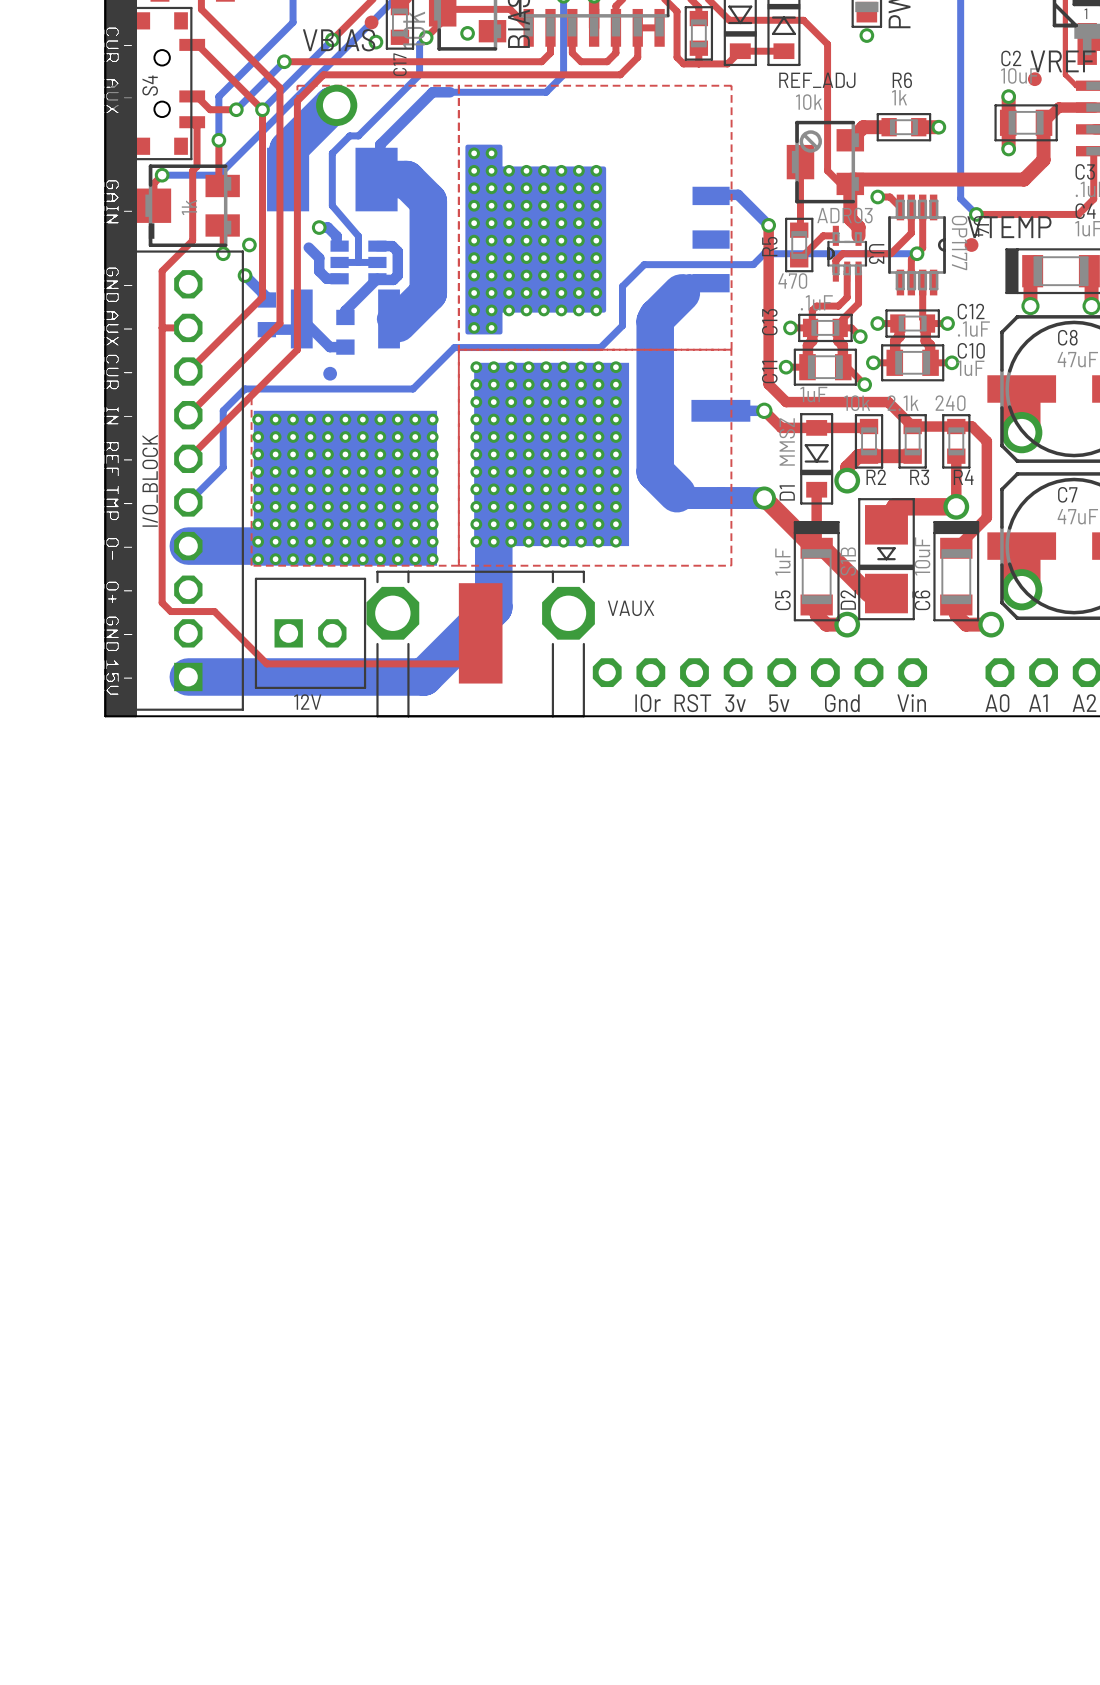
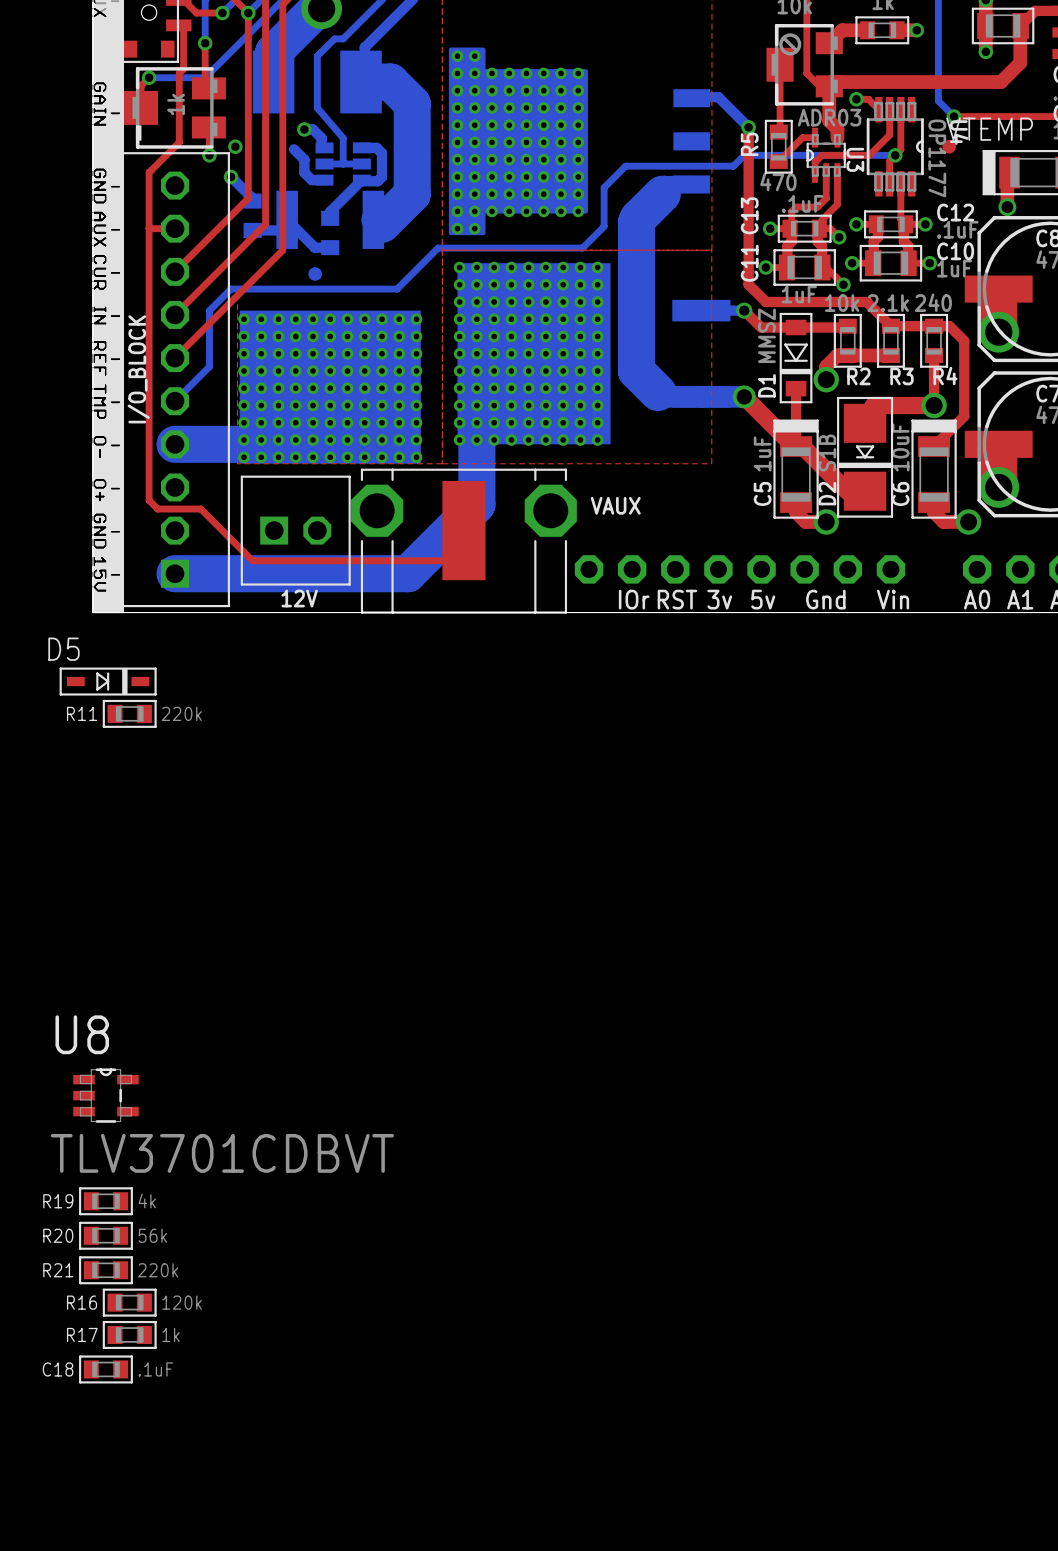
D5: none -> (108, 681)
R11: none -> 220k (129, 713)
U8: none -> TLV3701CDBVT (105, 1095)
R19: none -> 4k (105, 1201)
R20: none -> 56k (105, 1235)
R21: none -> 220k (105, 1270)
R16: none -> 120k (129, 1302)
R17: none -> 1k (129, 1334)
C18: none -> .1uF (105, 1369)

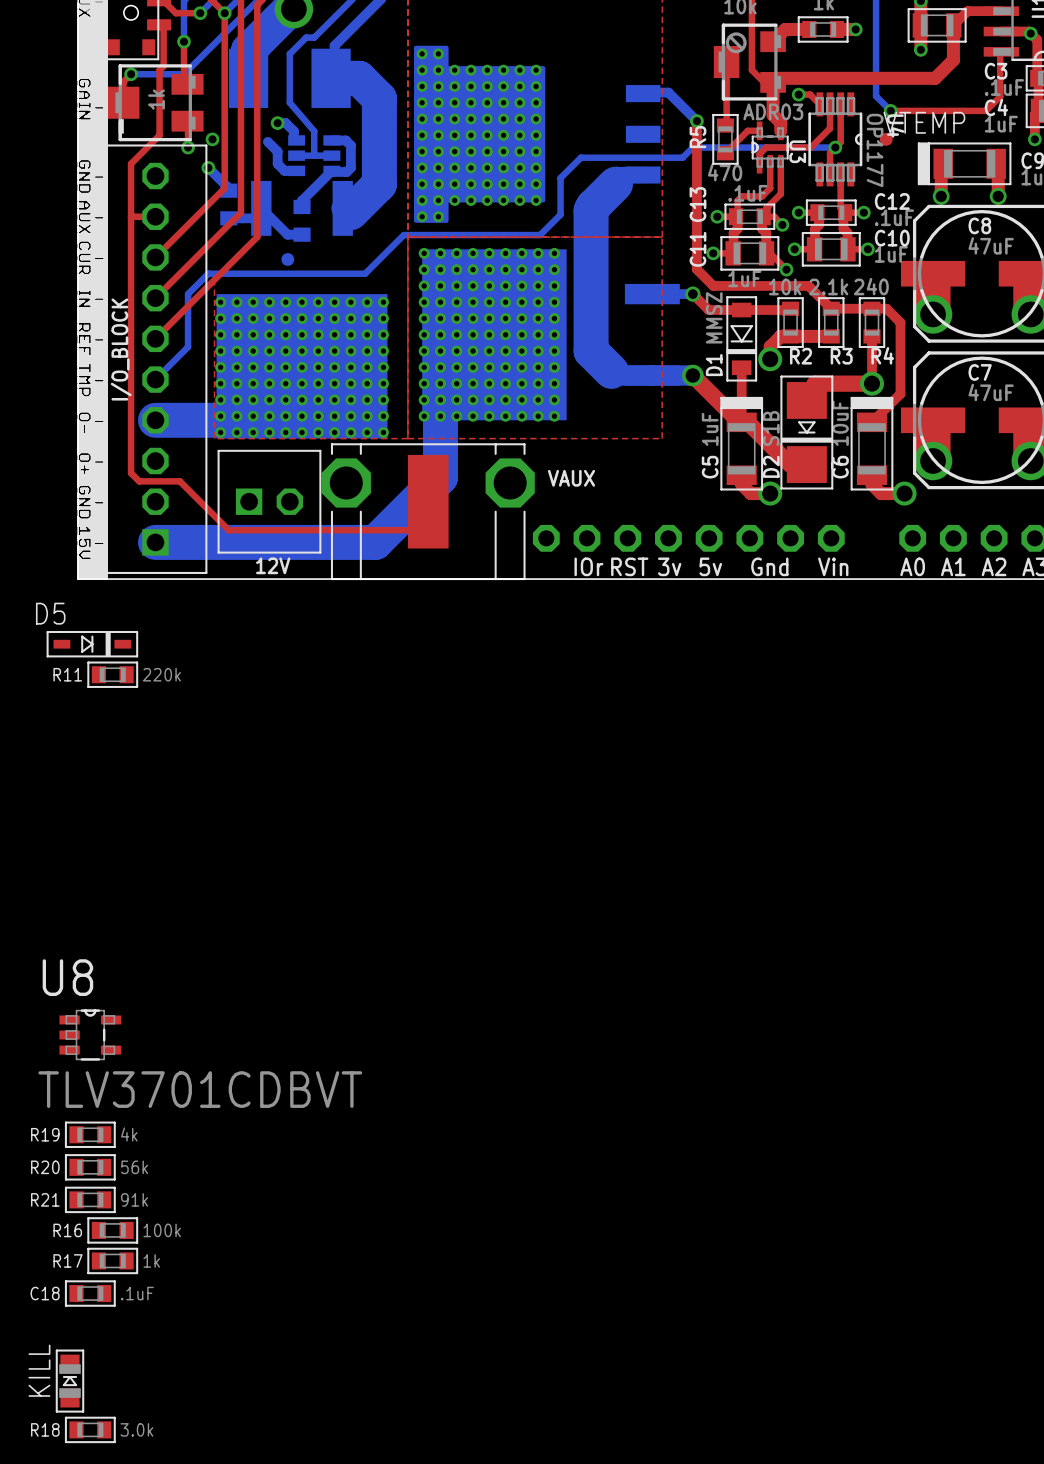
R21 value: 220k (158, 1270) -> 91k (134, 1199)
R16 value: 120k (182, 1302) -> 100k (162, 1230)
KILL: none -> (69, 1381)
R18: none -> 3.0k (90, 1429)

